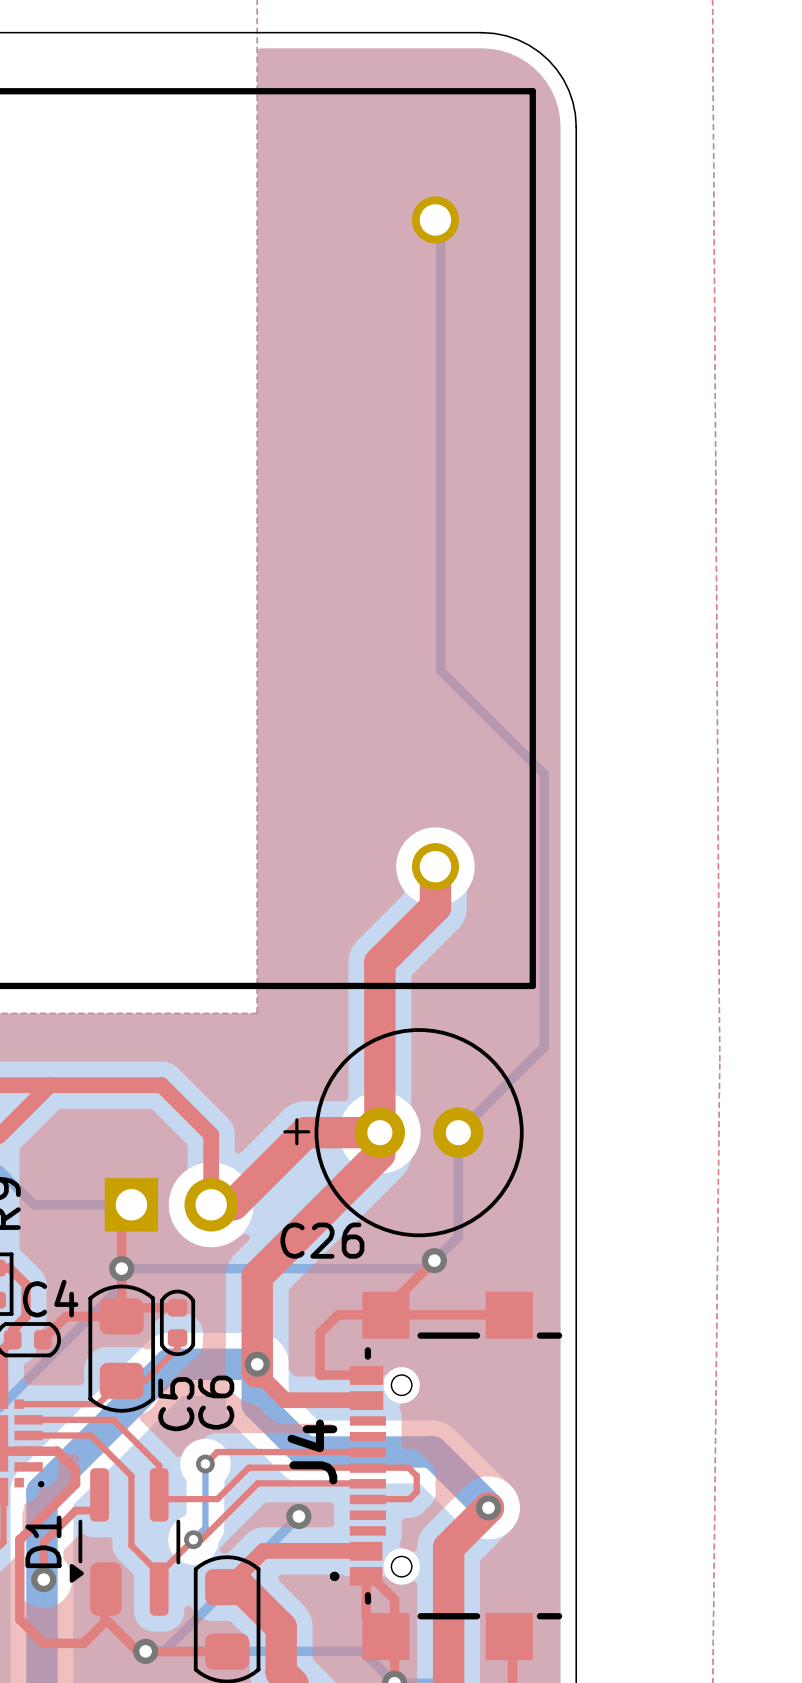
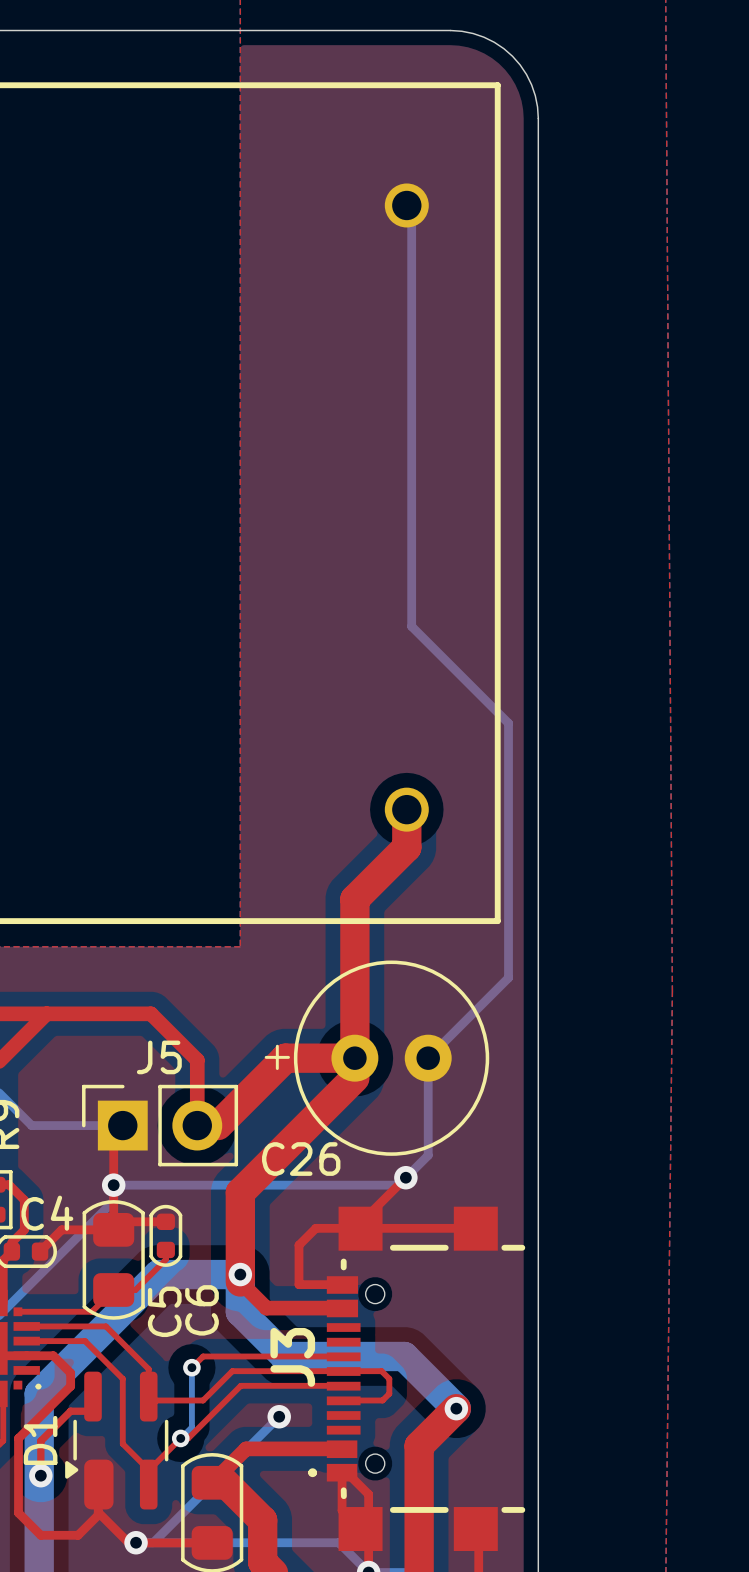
J5: none -> (160, 1125)
J4 name: J4 (312, 1452) -> J3 (292, 1357)

